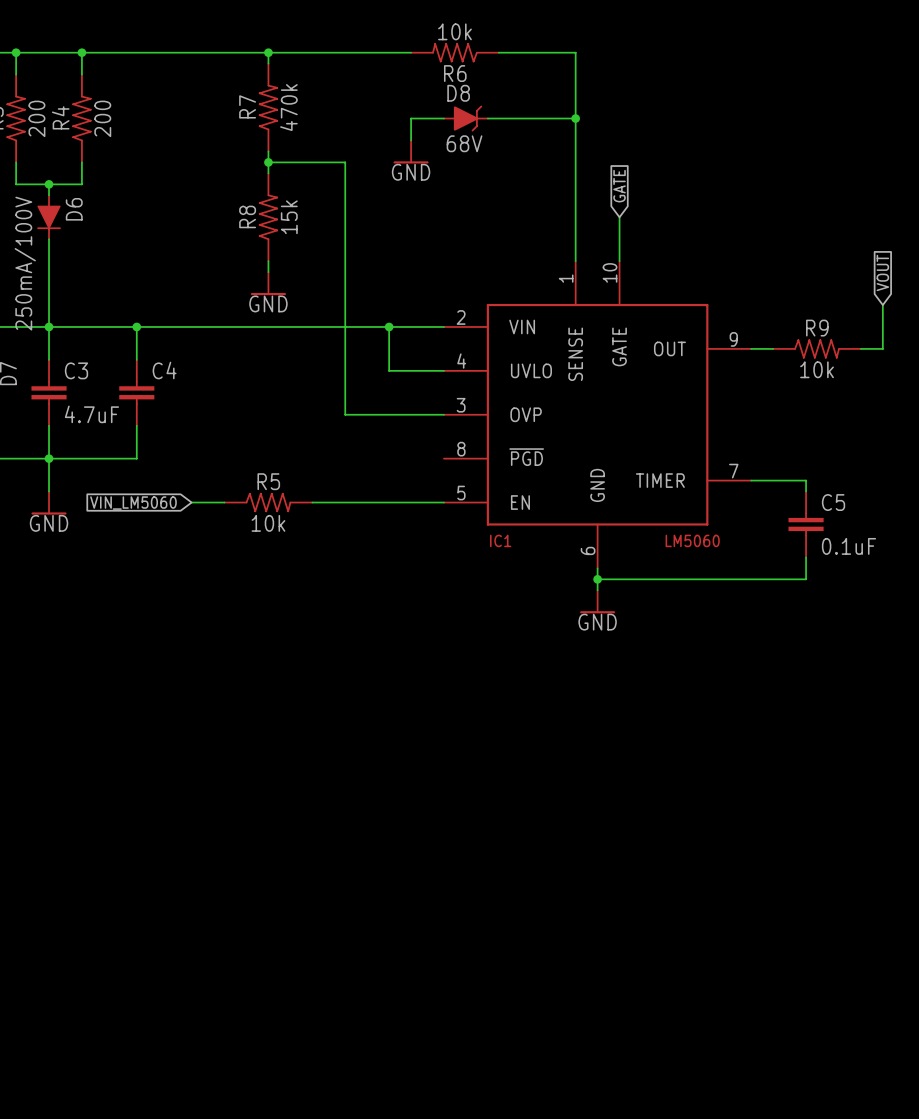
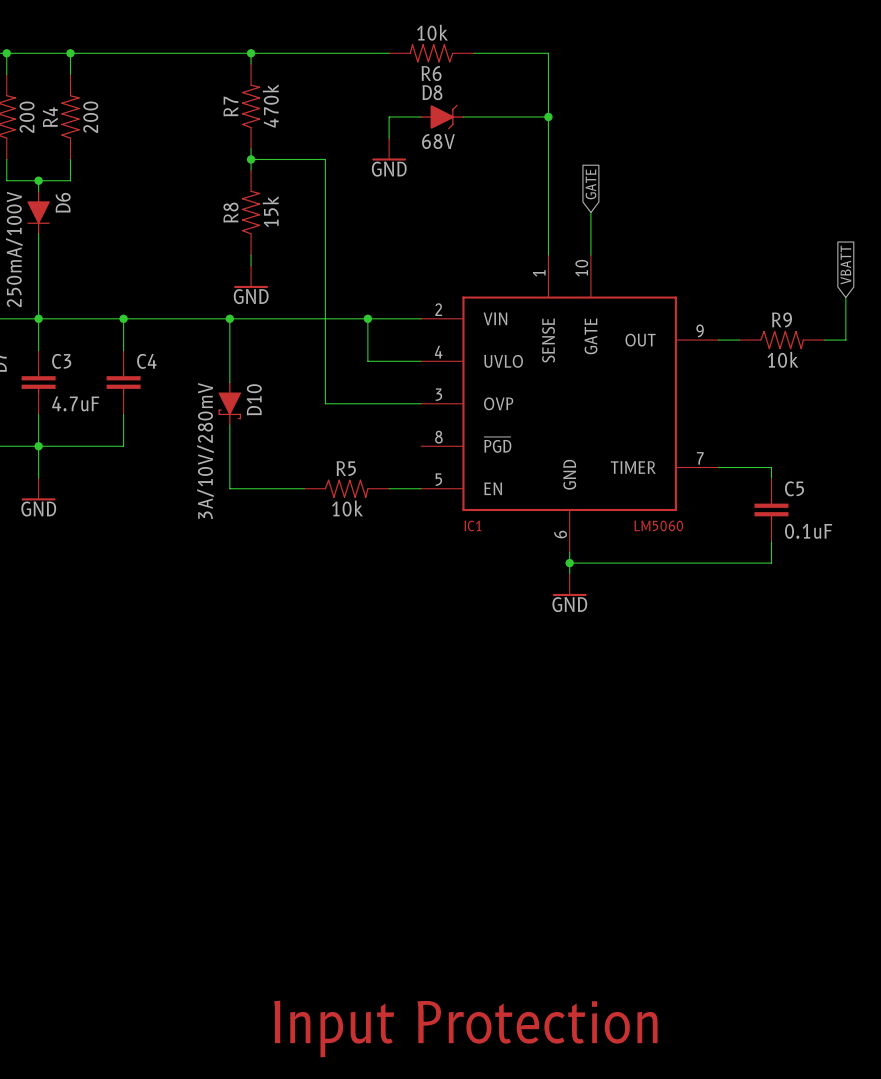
global label: VOUT (882, 272) -> VBATT (845, 265)
wire: none -> (229, 318) (229, 382)
junction: none -> (229, 318)
D10: none -> 3A/10V/280mV (229, 403)
wire: none -> (229, 425) (229, 488) (293, 488)
wire: (191, 502) (224, 502) -> none
R5 position: (268, 502) -> (346, 488)
global label: VIN_LM5060 (133, 503) -> none
text: none -> Input Protection (465, 1028)

